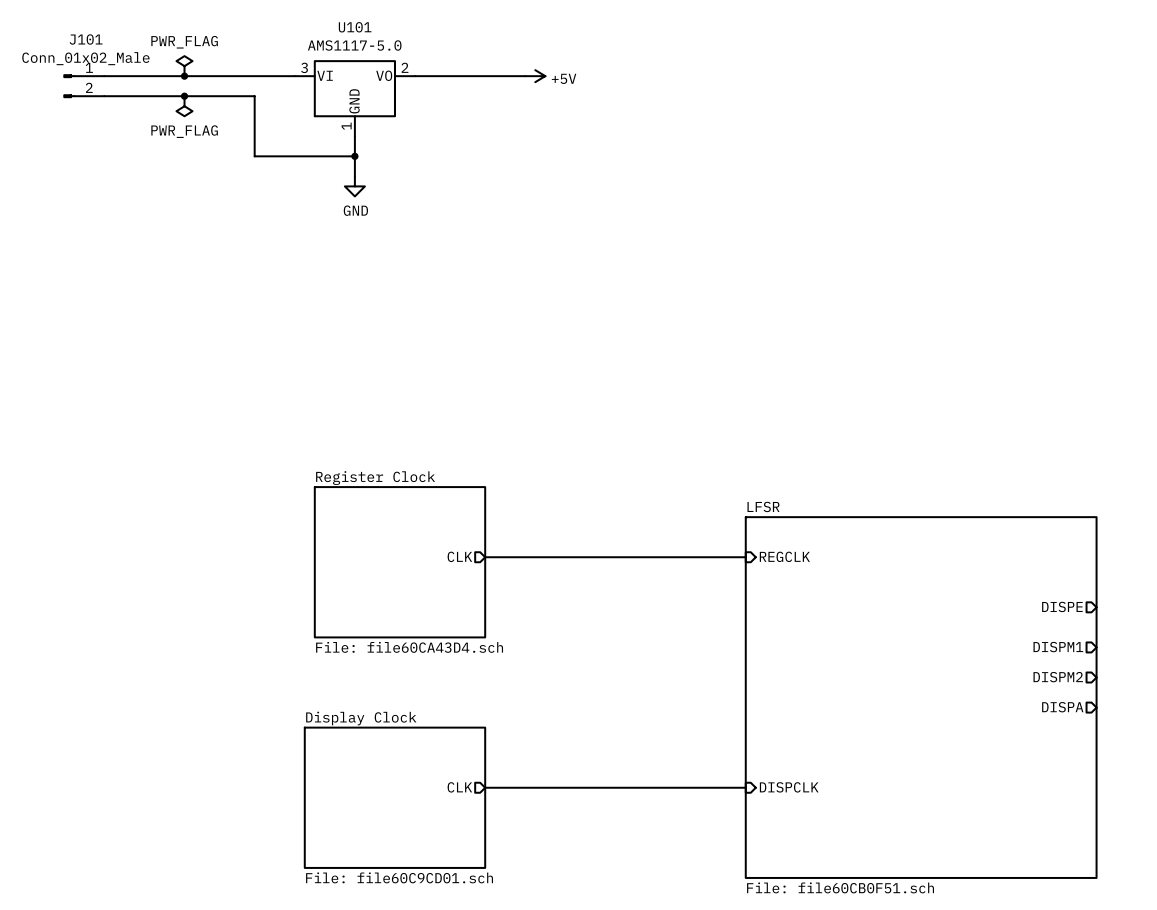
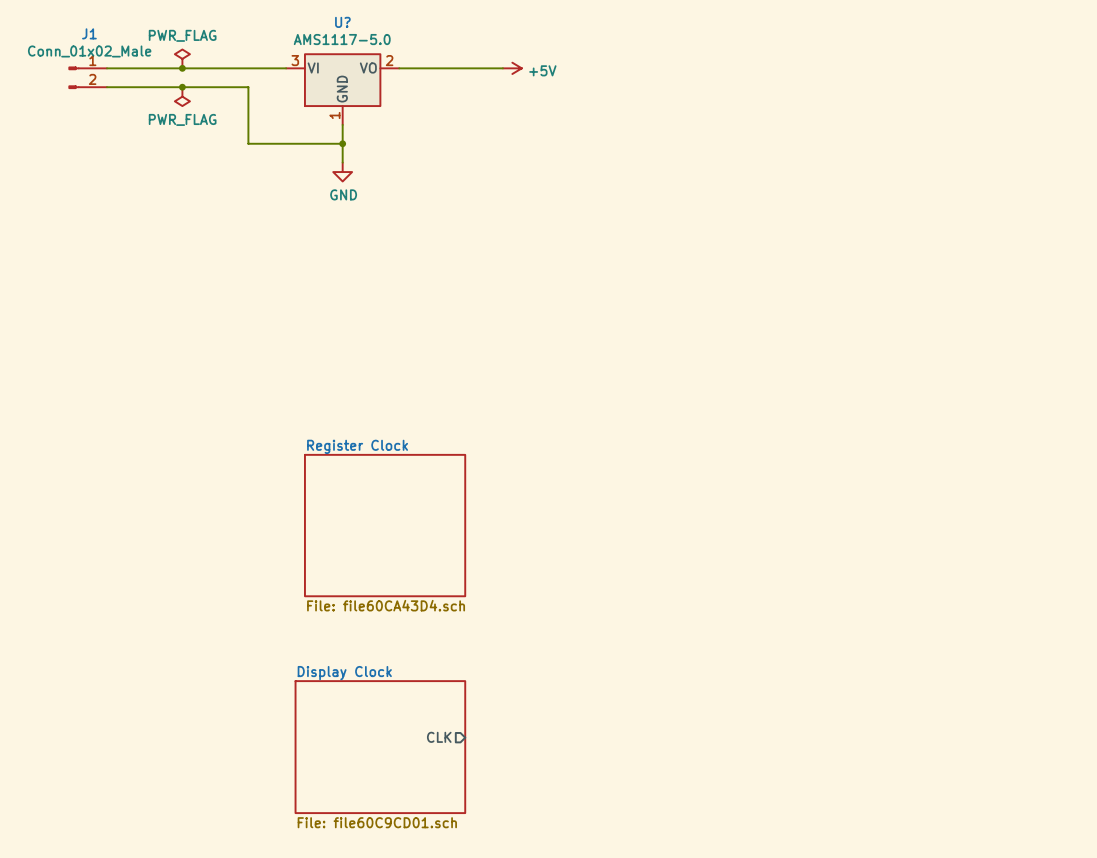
U101 name: U101 (355, 27) -> U? (342, 22)
J101 name: J101 (86, 39) -> J1 (89, 33)
sheet pin: CLK (459, 556) -> none
sheet pin: REGCLK (784, 556) -> none
wire: (485, 557) (745, 557) -> none
sheet pin: DISPE (1062, 606) -> none
sheet pin: DISPM1 (1058, 647) -> none
sheet pin: DISPM2 (1058, 677) -> none
sheet LFSR: File: file60CB0F51.sch (921, 697) -> none
sheet pin: DISPA (1062, 707) -> none
wire: (485, 787) (745, 787) -> none
sheet pin: DISPCLK (789, 787) -> none

